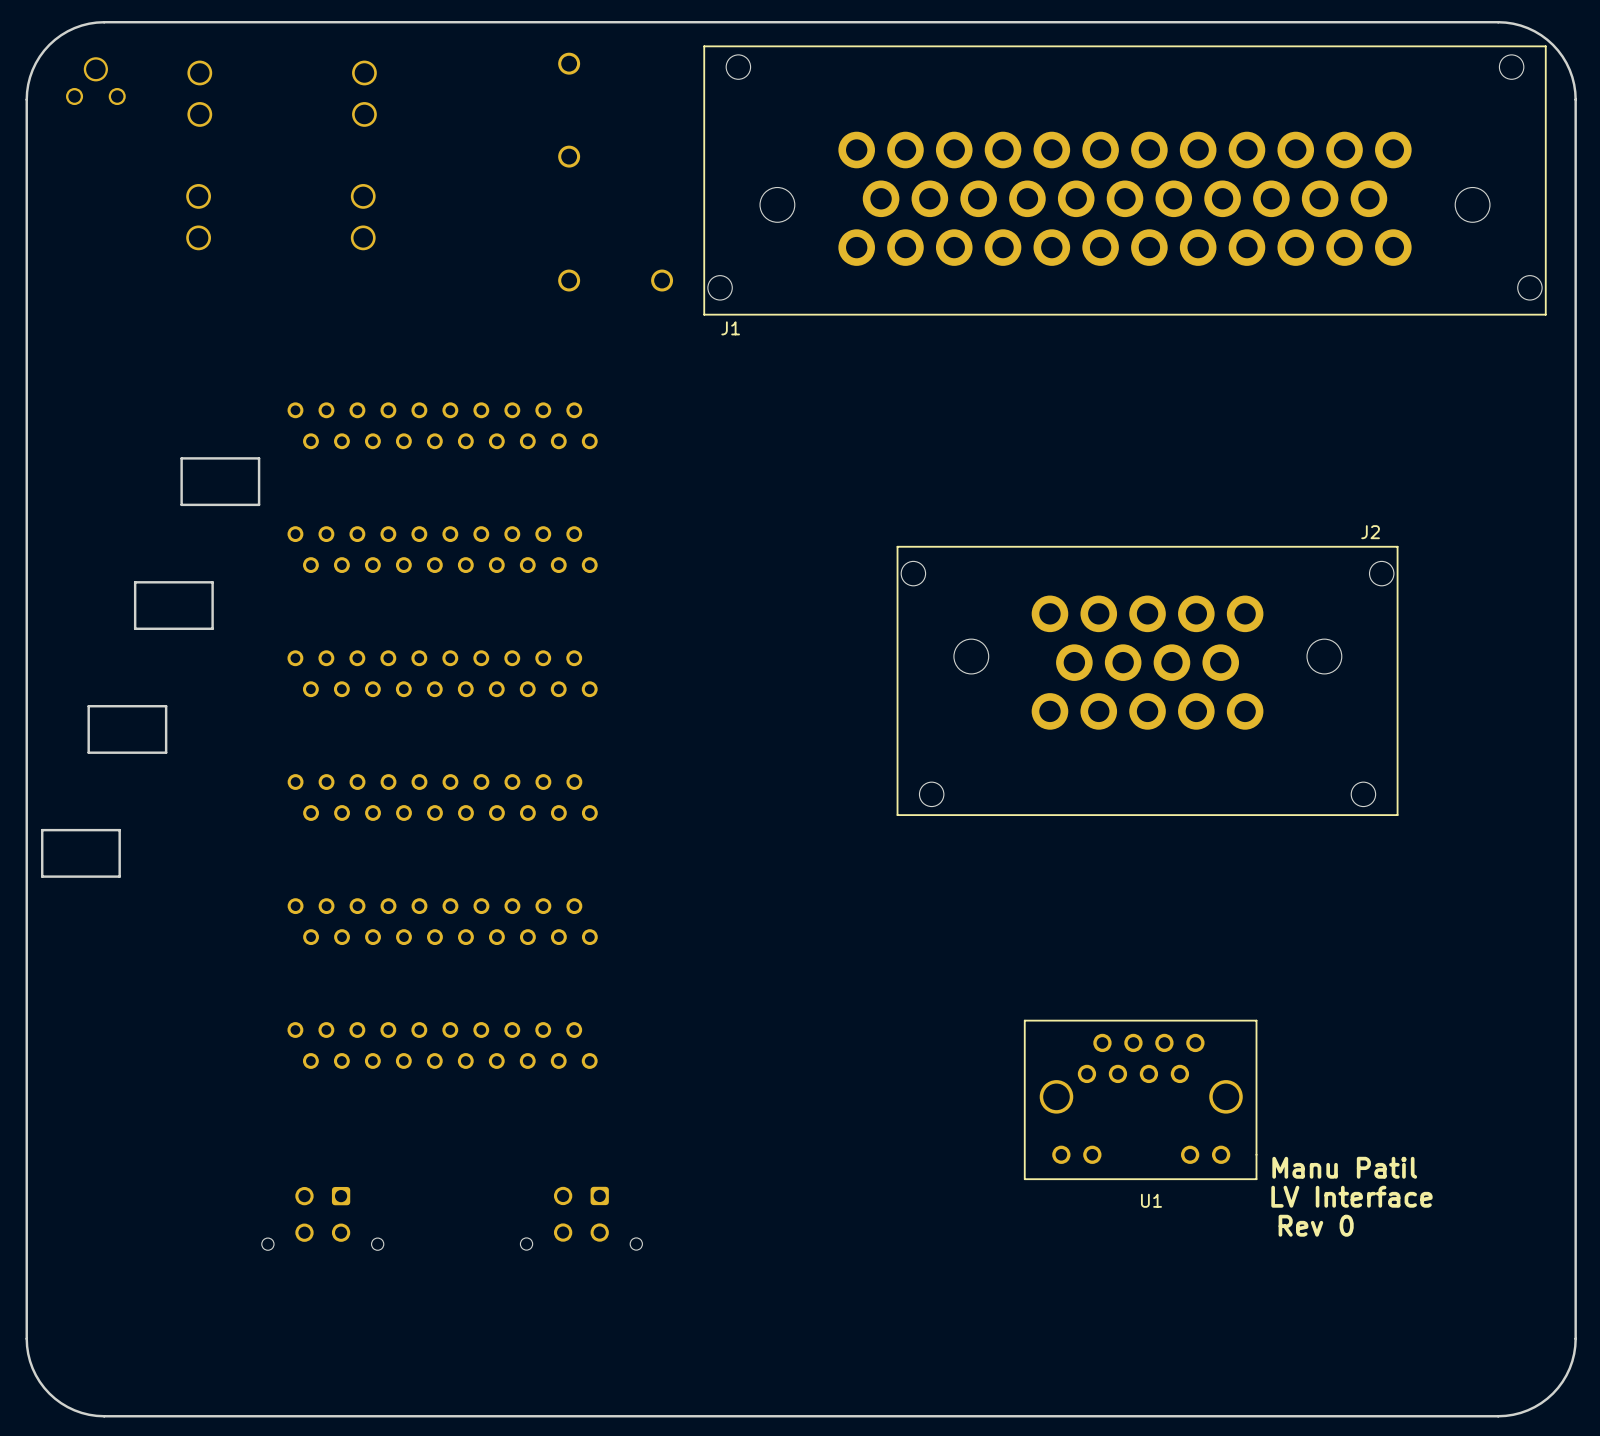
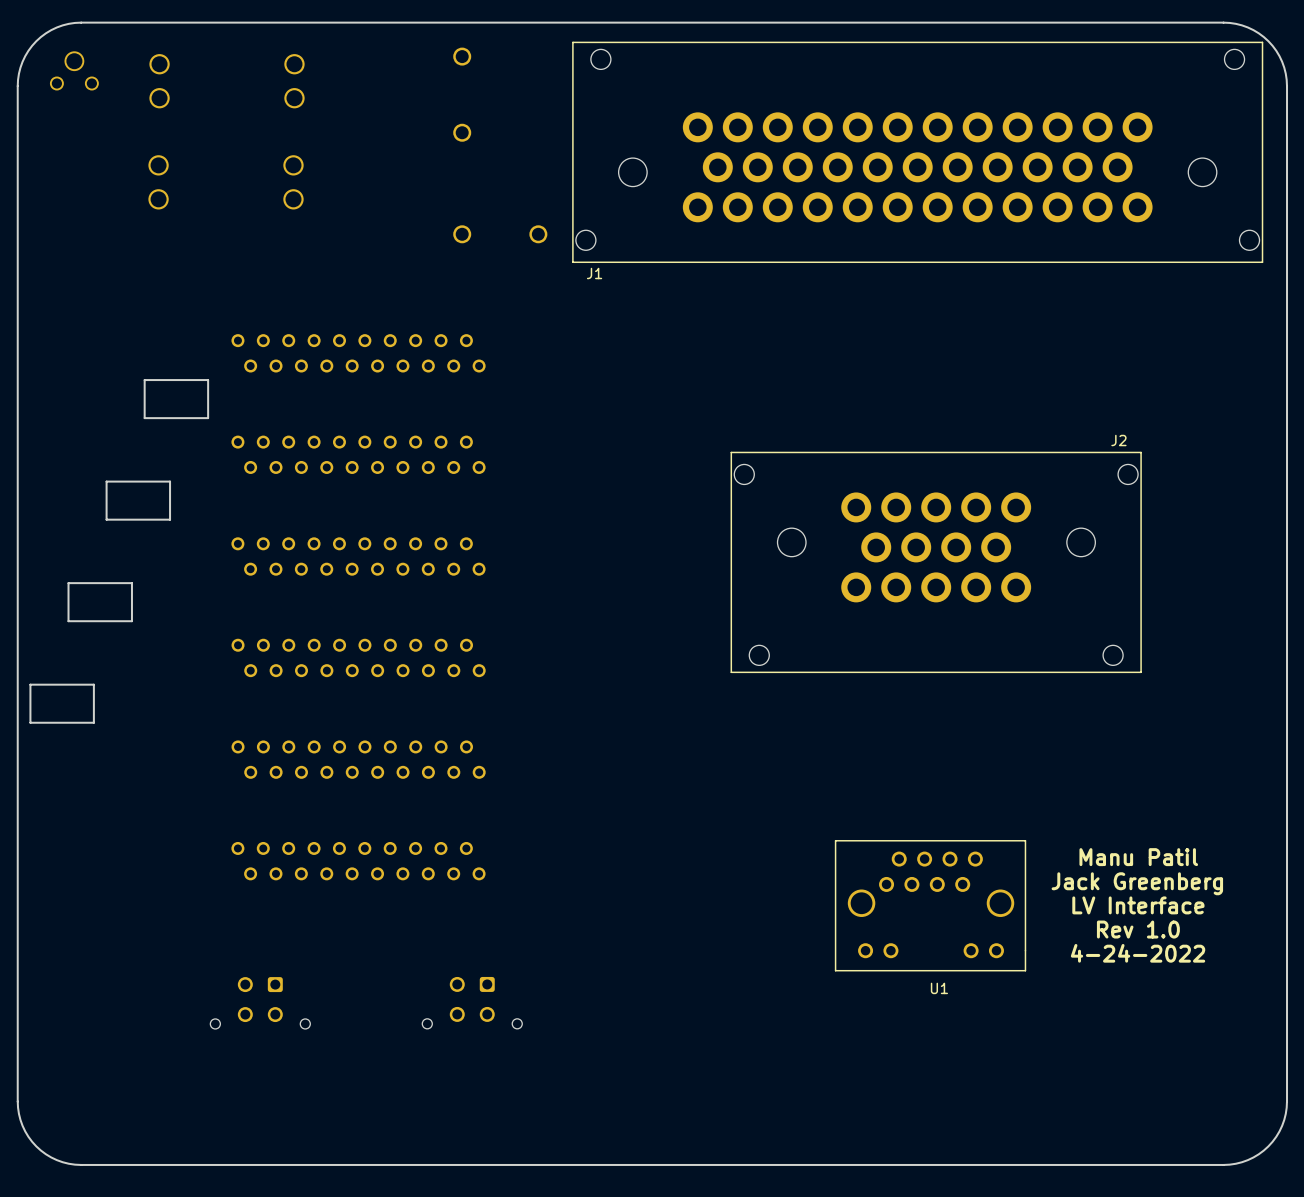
text: none -> Jack Greenberg (1137, 883)
text: none -> Rev 1.0 (1138, 929)
text: none -> 4-24-2022 (1138, 953)
text position: Manu Patil (1344, 1167) -> Manu Patil (1138, 857)
text position: LV Interface (1351, 1196) -> LV Interface (1138, 905)
text: Rev 0 (1316, 1225) -> none

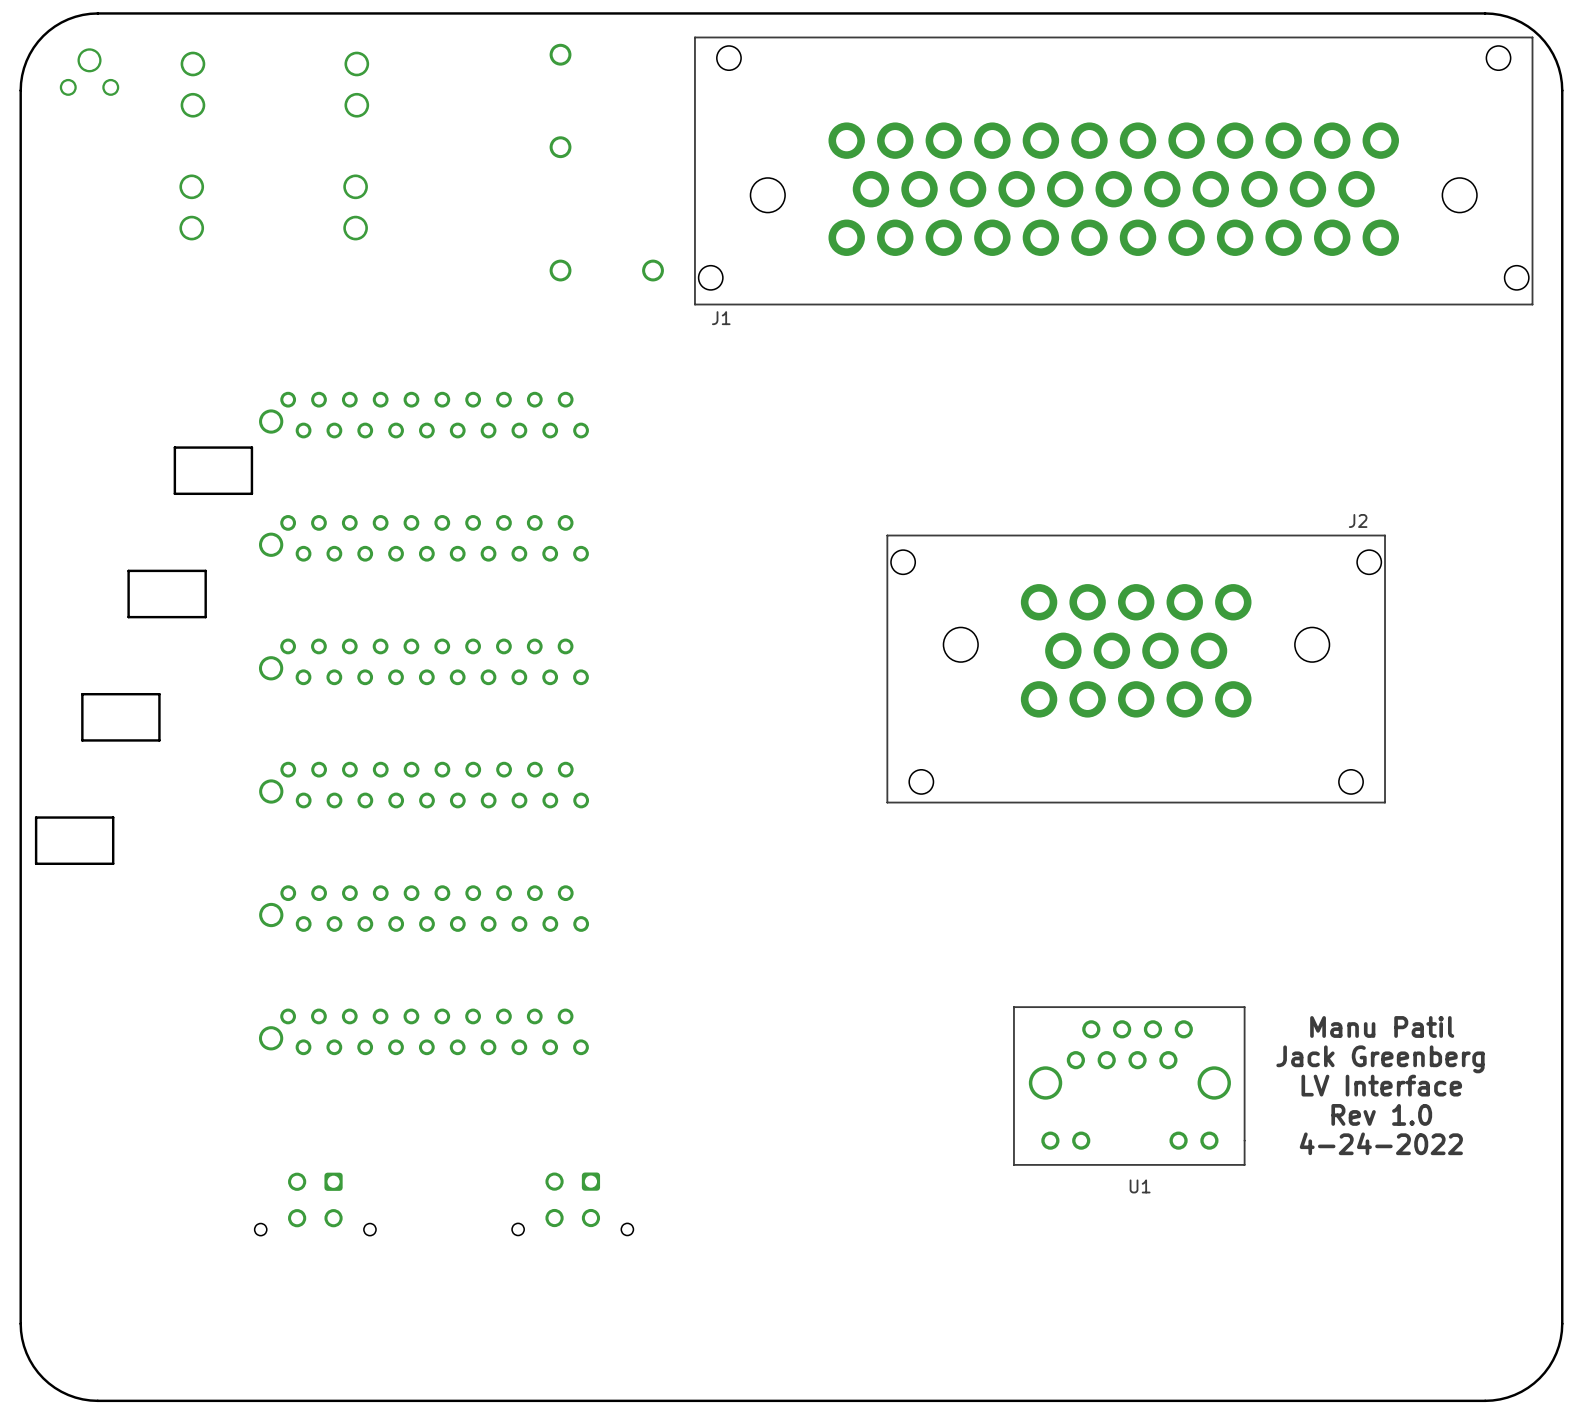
part footprint: [231, 334, 486, 373] -> [259, 391, 589, 439]
part footprint: [231, 435, 486, 474] -> [258, 515, 589, 562]
part footprint: [231, 537, 486, 576] -> [258, 638, 589, 686]
part footprint: [231, 638, 486, 678] -> [259, 761, 590, 809]
part footprint: [231, 740, 486, 779] -> [259, 885, 590, 932]
part footprint: [231, 841, 486, 881] -> [258, 1008, 589, 1056]

